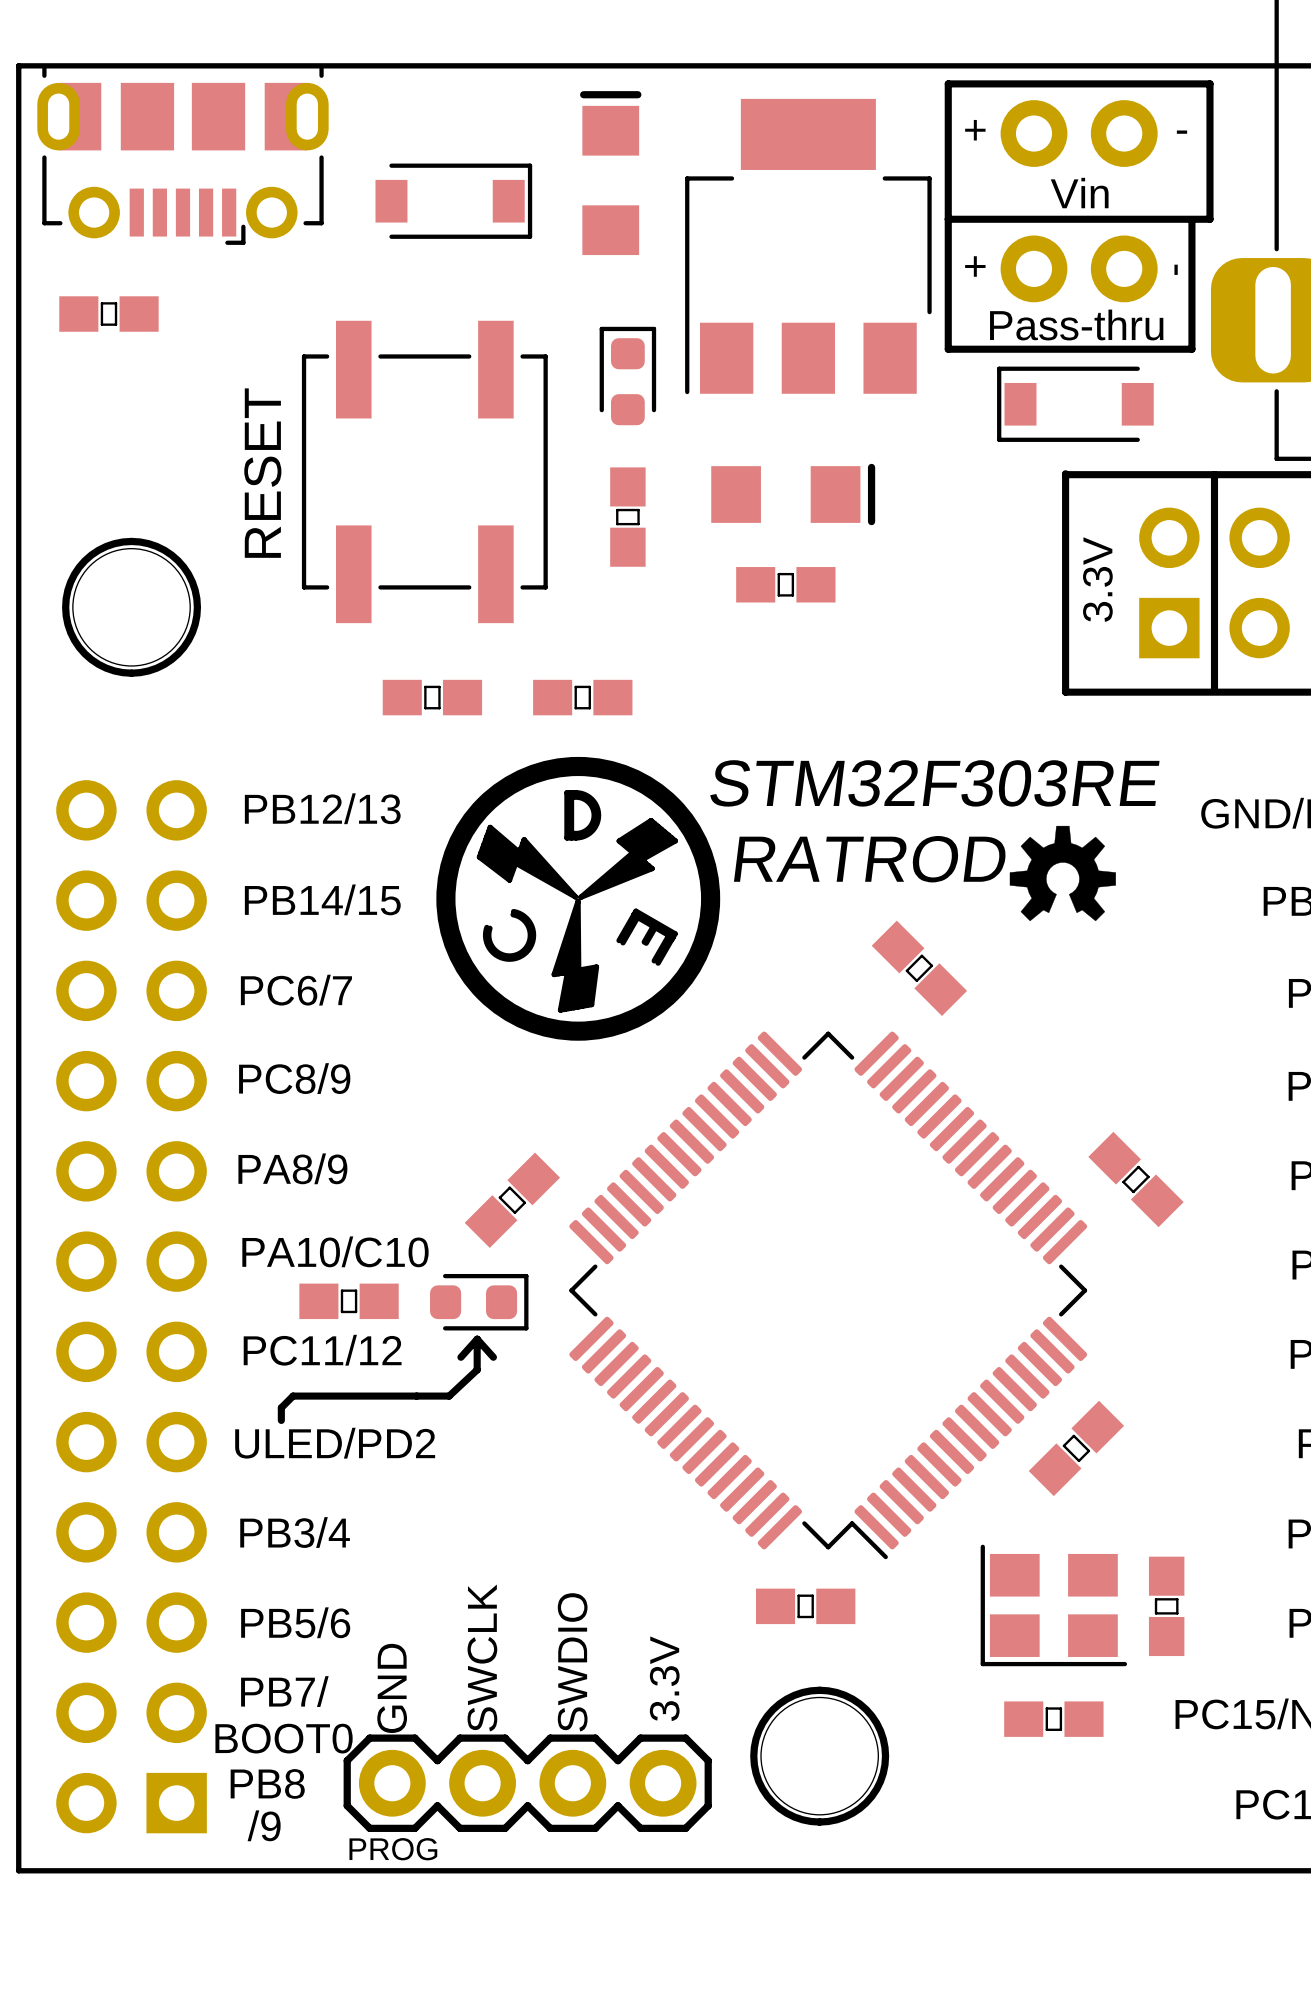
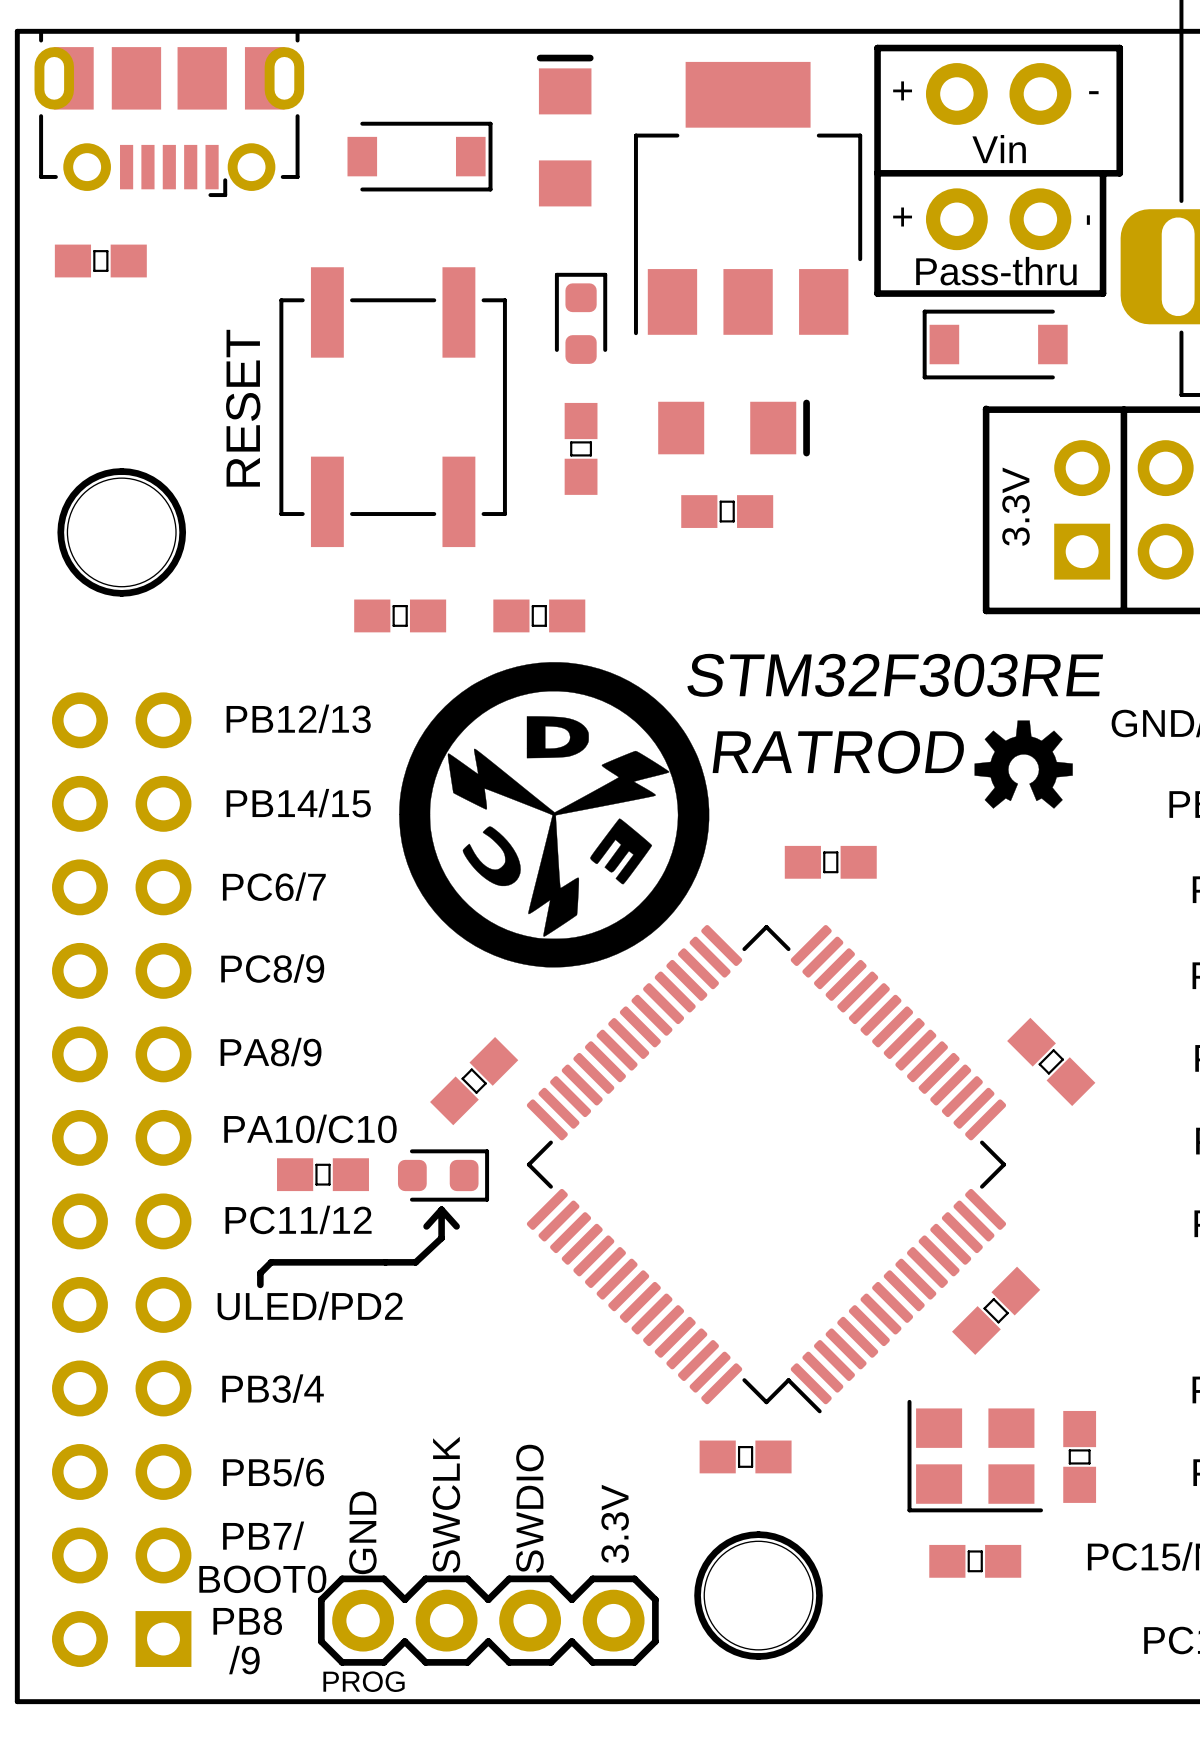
drawing shape: [436, 756, 721, 1041] -> [399, 662, 710, 968]
text position: STM32F303RE (934, 783) -> STM32F303RE (895, 675)
text position: RATROD (870, 859) -> RATROD (838, 752)
drawing position: (1062, 873) -> (1023, 764)
part rotation: 0° (919, 968) -> 45° counterclockwise (830, 862)

